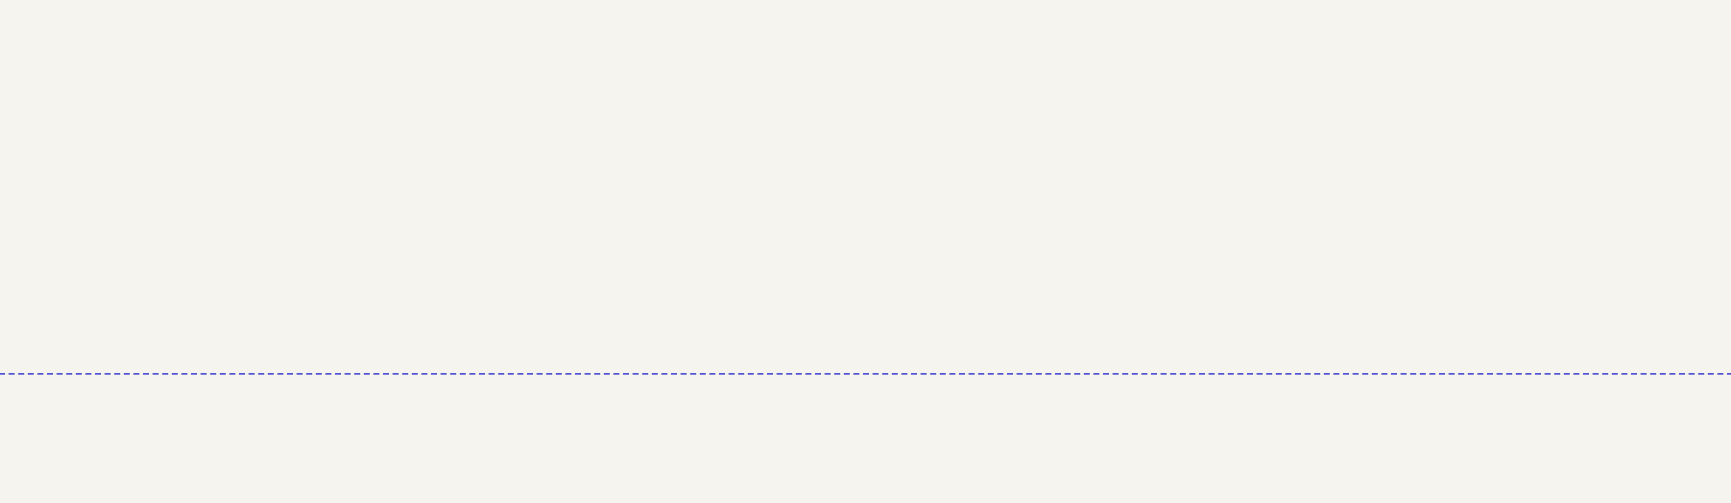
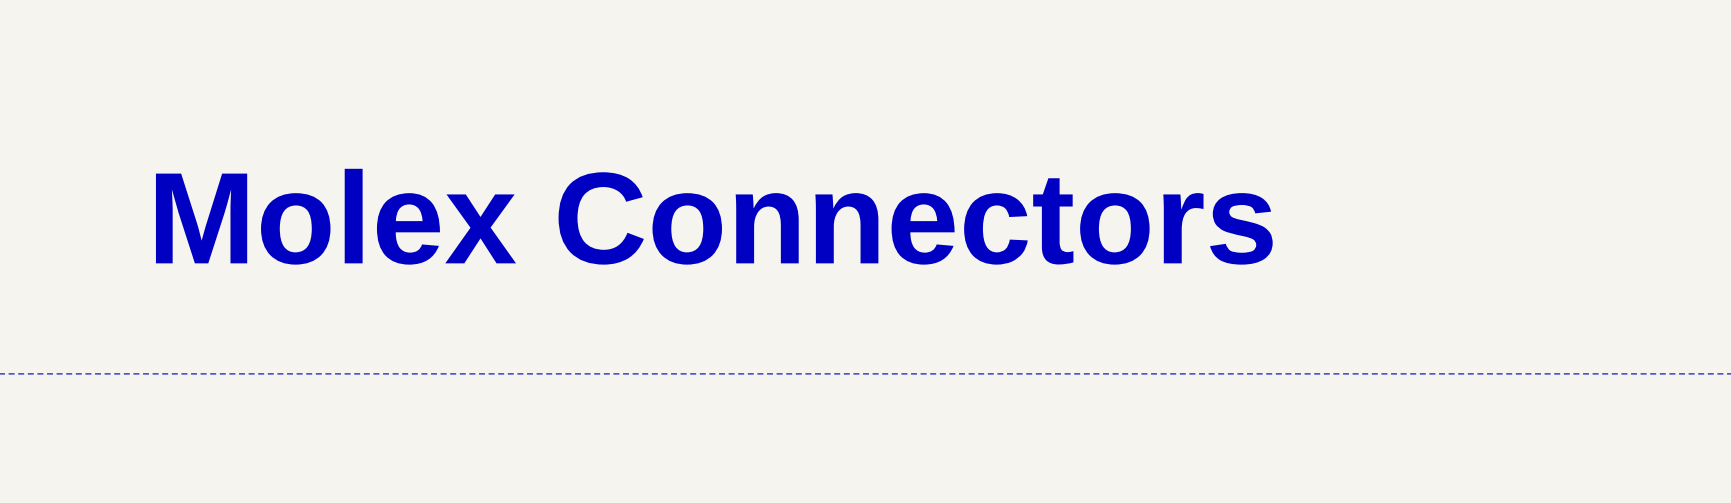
text: none -> Molex Connectors (714, 216)

